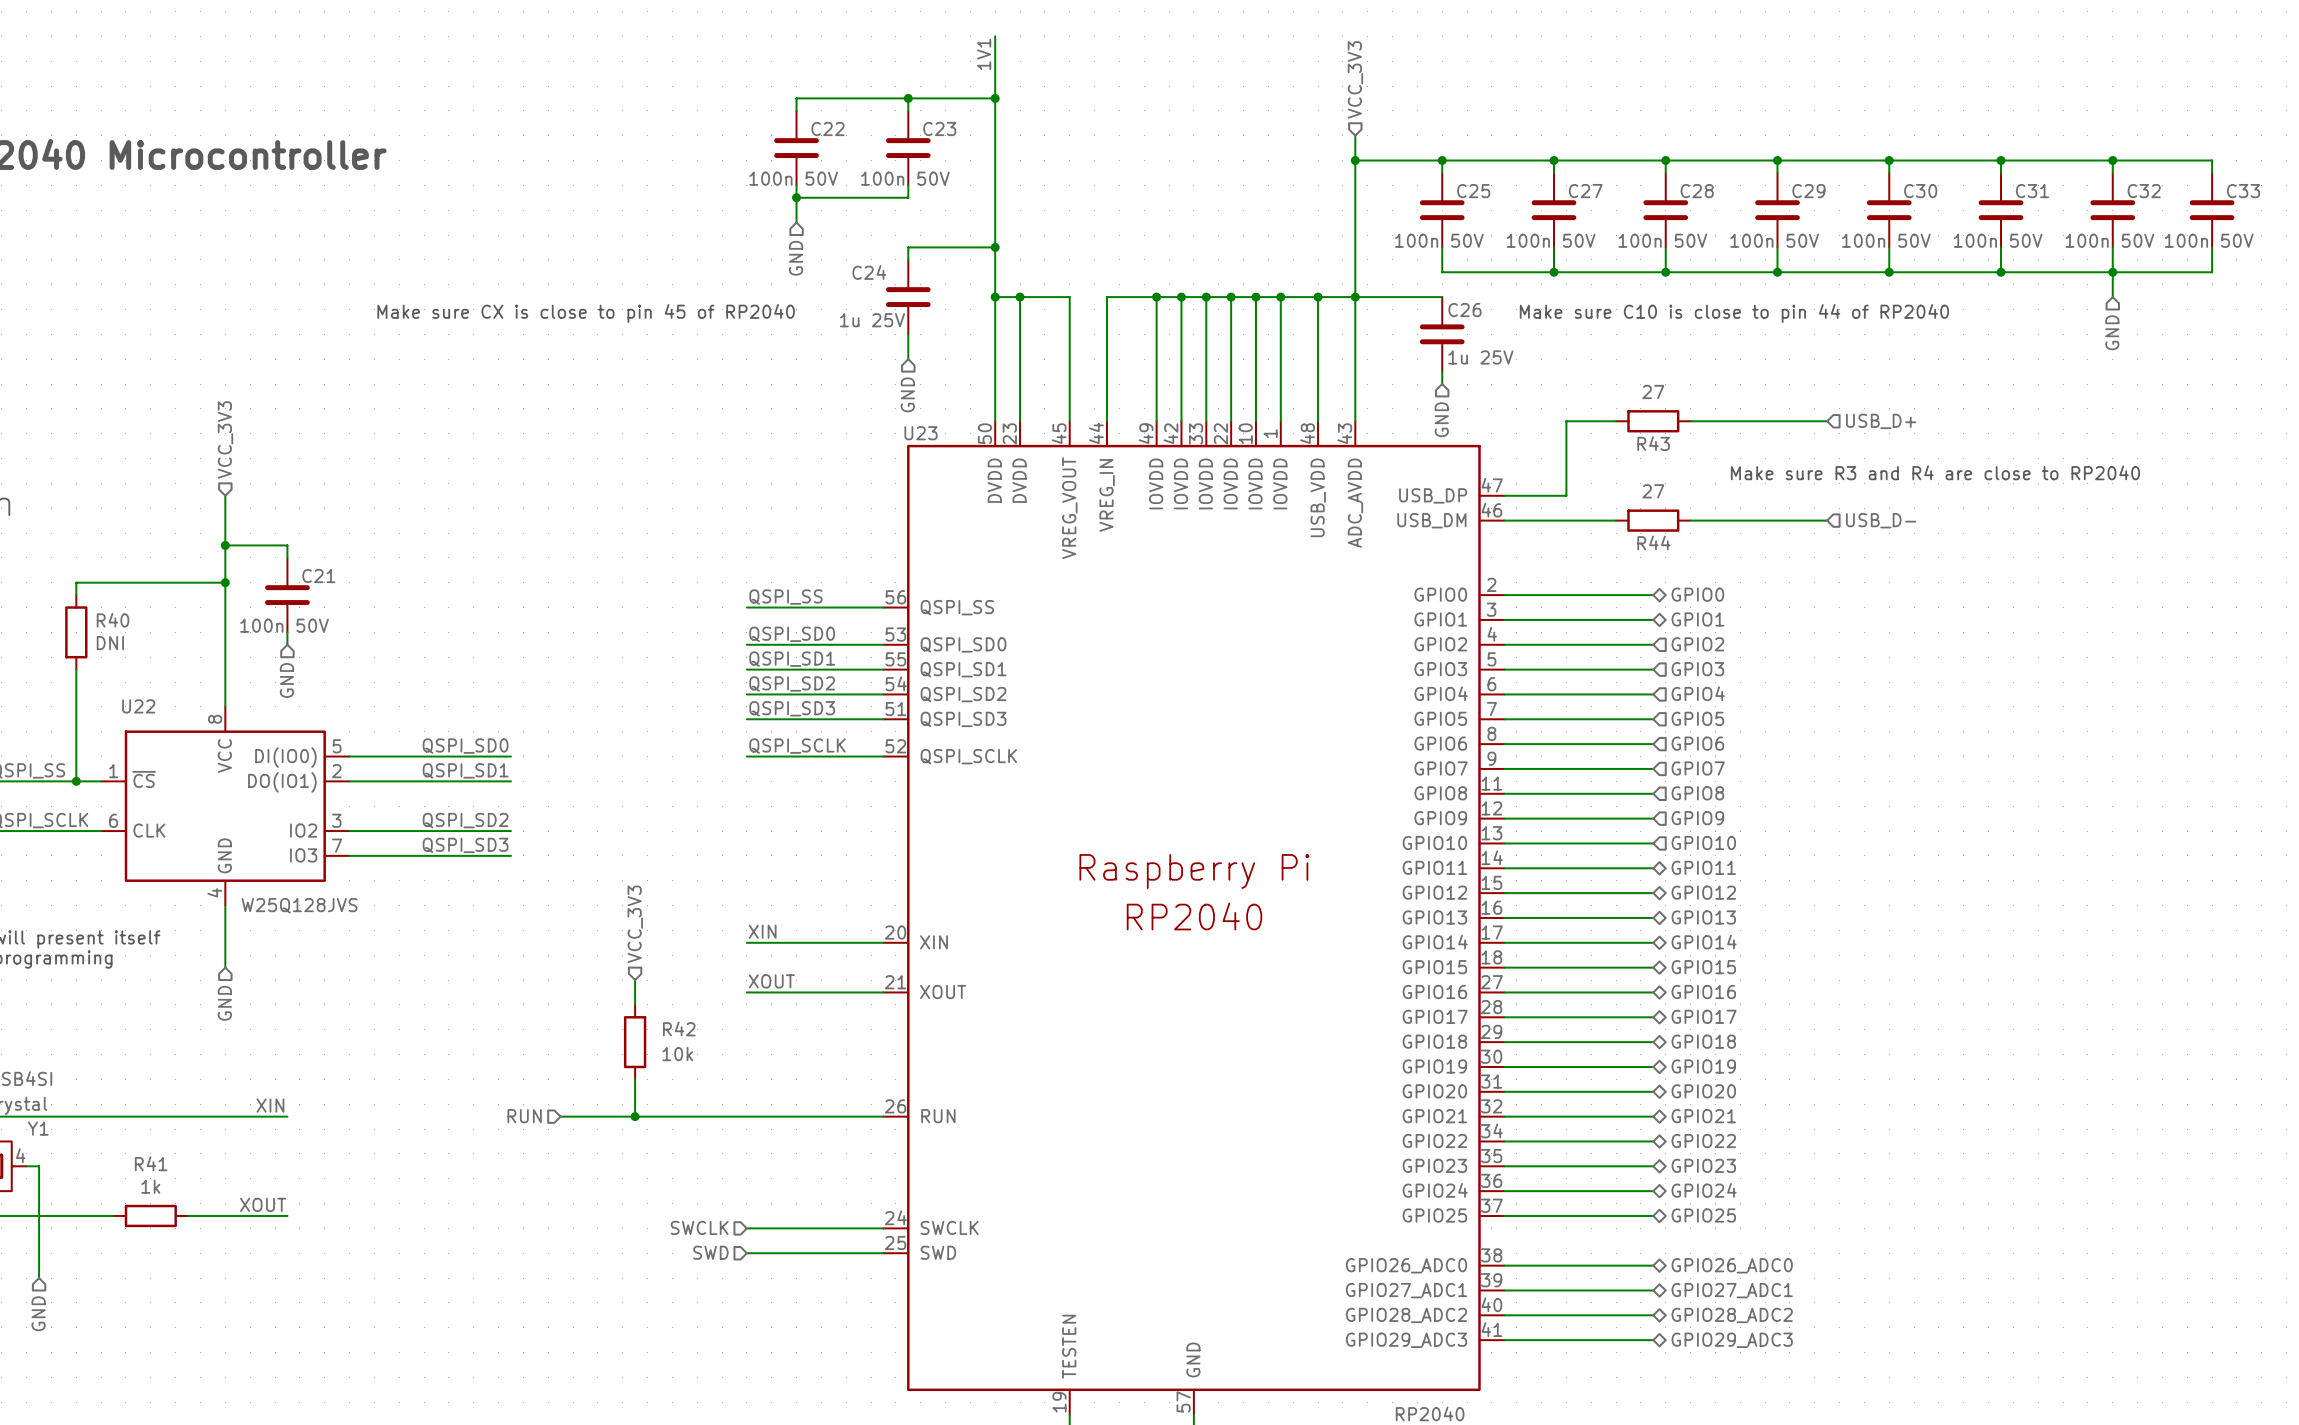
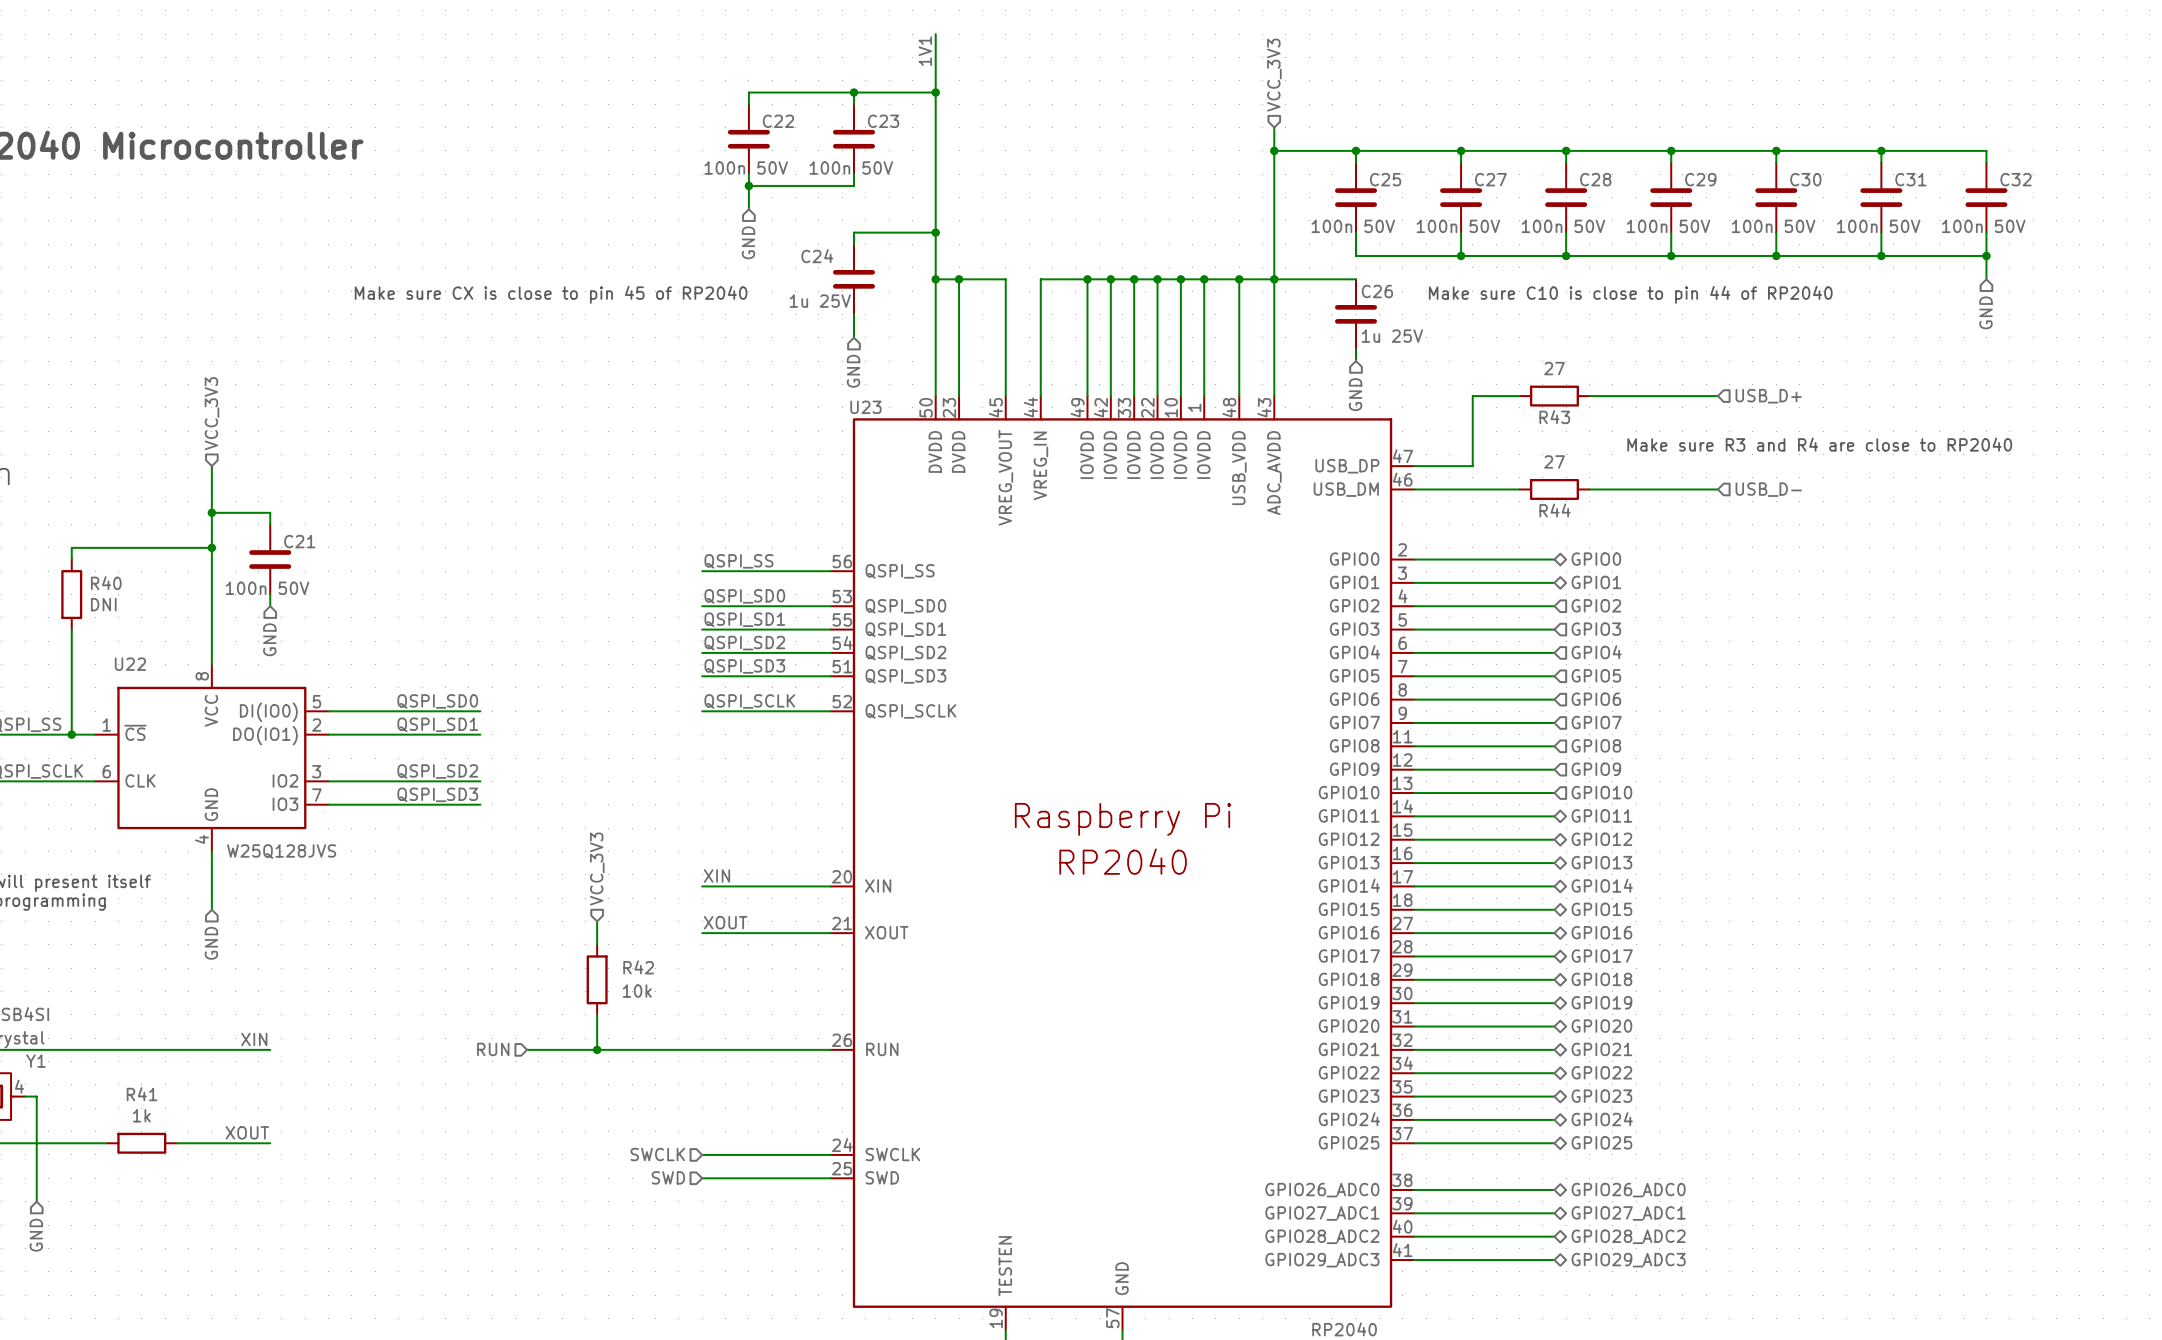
wire: (2112, 160) (2212, 160) (2212, 172) -> none
junction: (2112, 160) -> none
C33: 100n 50V (2212, 210) -> none
wire: (2212, 247) (2212, 272) (2112, 272) -> none

